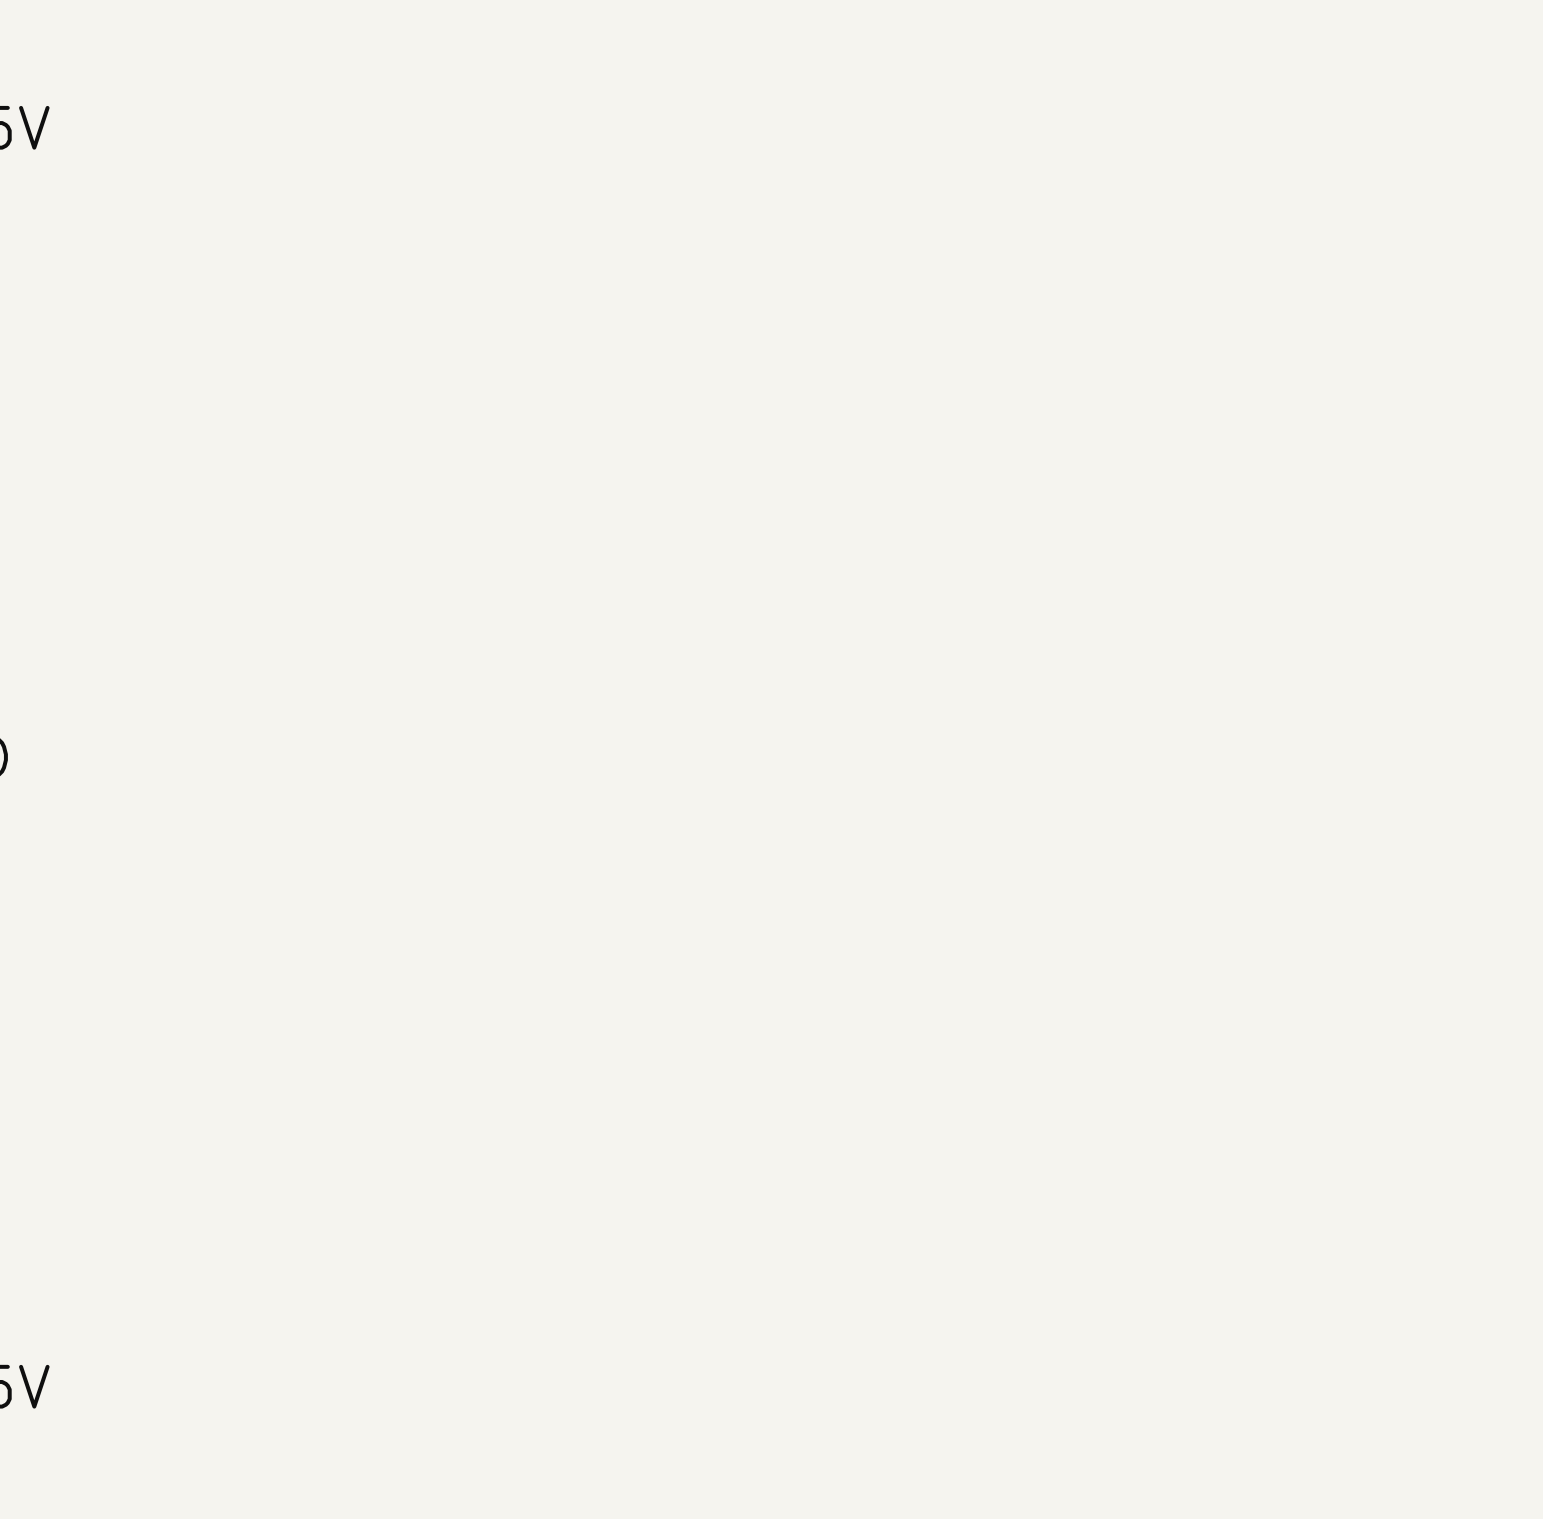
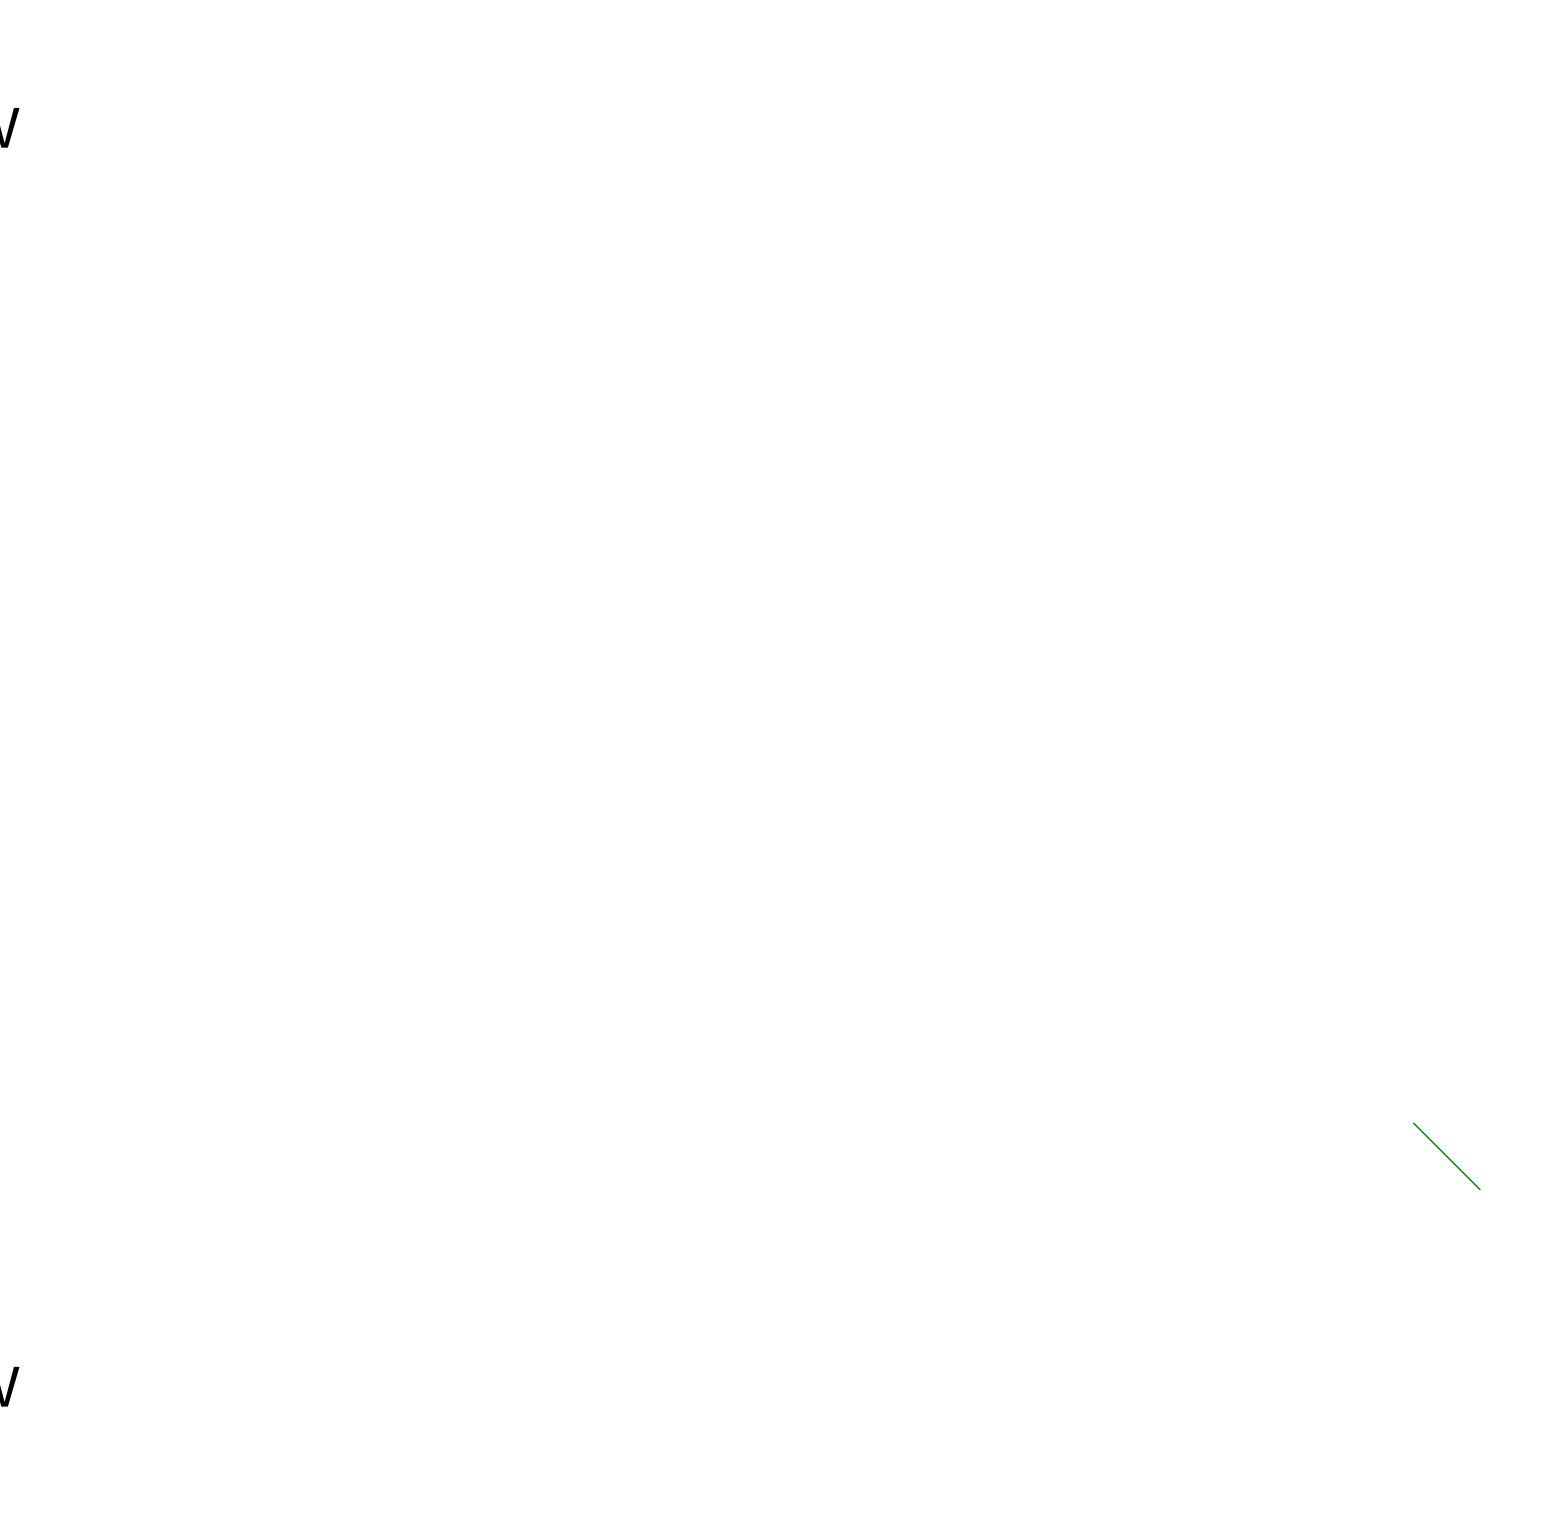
wire: none -> (1413, 1123) (1479, 1189)

